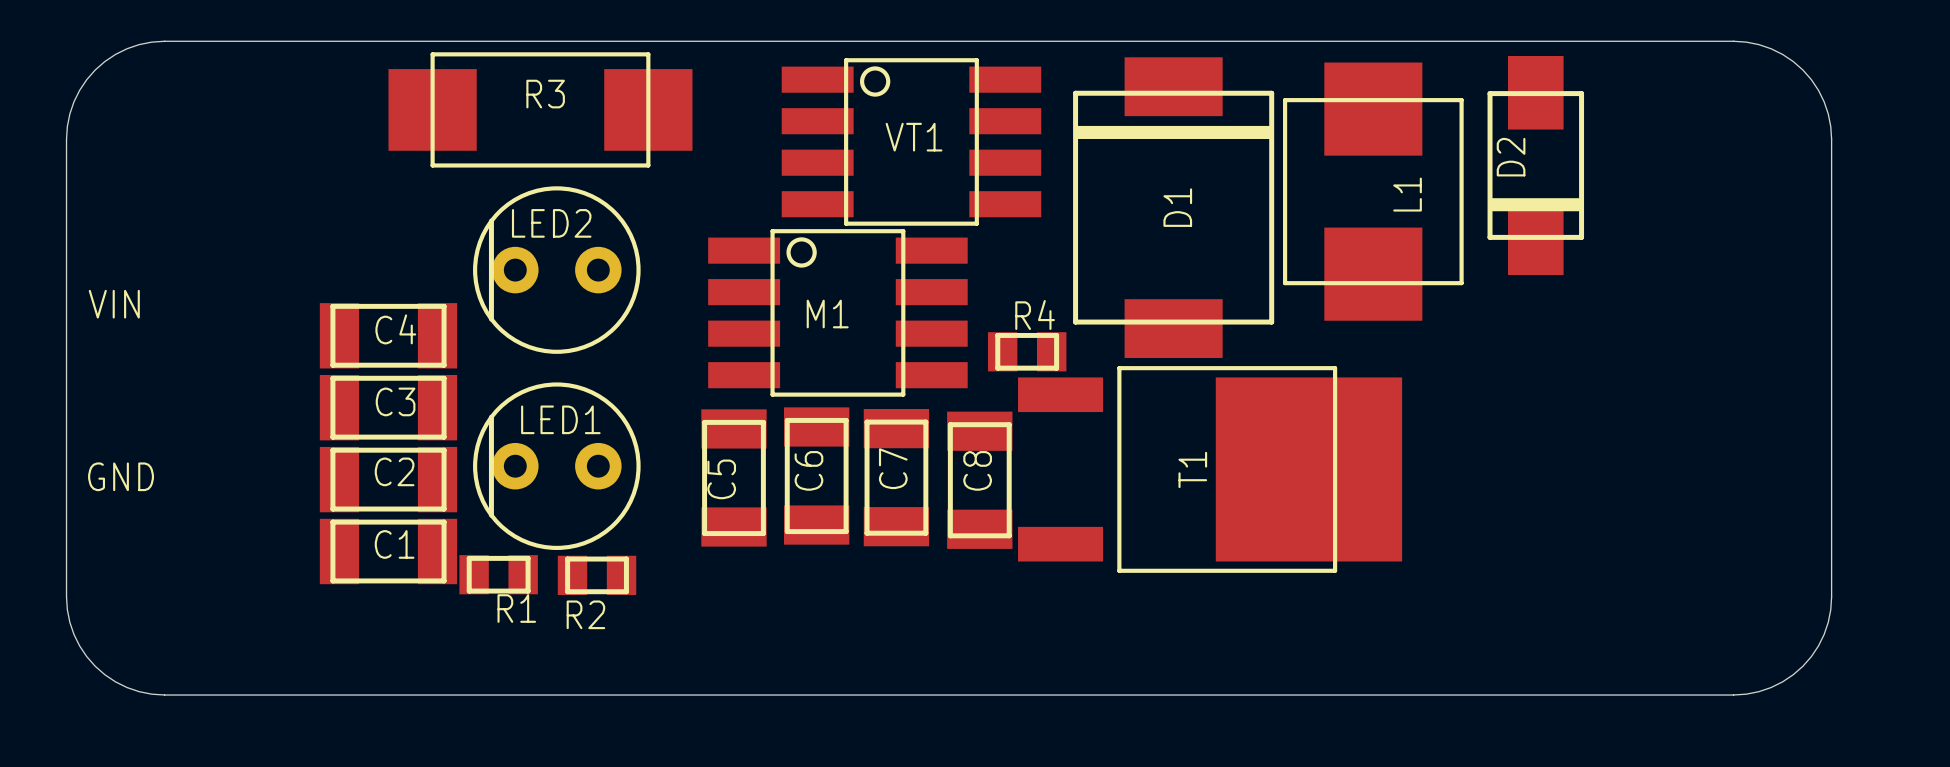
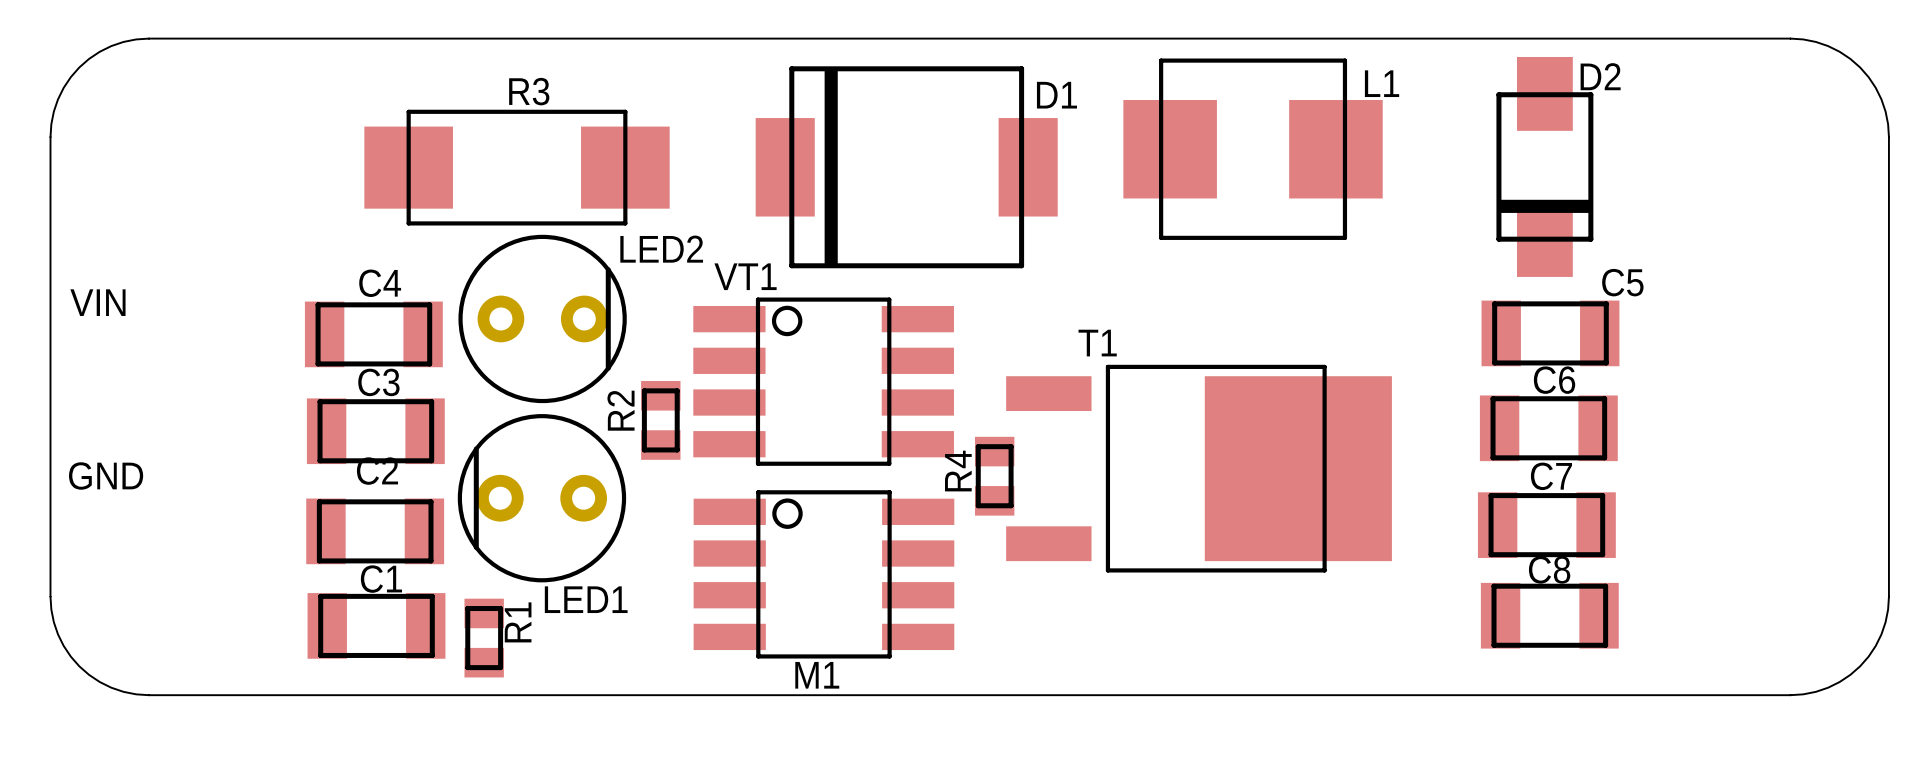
board edge: (1733, 41) (1758, 44) (1771, 48) (1793, 61) (1802, 70) (1811, 79) (1824, 101) (1828, 113) (1831, 139) (1830, 609) (1828, 622) (1818, 645) (1811, 656) (1793, 674) (1782, 681) (1758, 691) (1733, 695) -> (1724, 38) (1803, 39) (1815, 41) (1839, 51) (1860, 67) (1875, 87) (1885, 111) (1888, 137) (1888, 596) (1885, 622) (1875, 645) (1868, 656) (1850, 674) (1828, 687) (1803, 694) (1724, 695)
R3 position: (540, 109) -> (517, 167)
VT1 name position: VT1 (914, 137) -> VT1 (745, 276)
VT1 position: (911, 141) -> (823, 381)
D2 name rotation: 0° (1511, 157) -> 90° clockwise (1600, 76)
D2 name position: D2 (1511, 157) -> D2 (1600, 76)
D2 position: (1535, 165) -> (1544, 166)
L1 rotation: 0° (1373, 191) -> 90° clockwise (1253, 149)
L1 name position: L1 (1407, 194) -> L1 (1382, 83)
D1 rotation: 0° (1173, 207) -> 90° counterclockwise (906, 167)
D1 position: (1173, 207) -> (906, 167)
D1 name position: D1 (1177, 207) -> D1 (1056, 95)
LED2 name position: LED2 (551, 223) -> LED2 (661, 249)
LED2 rotation: 0° (556, 270) -> 180° (542, 318)
M1 position: (837, 312) -> (823, 574)
M1 name position: M1 (827, 314) -> M1 (817, 675)
C4 name position: C4 (395, 329) -> C4 (380, 283)
R4 rotation: 0° (1027, 351) -> 90° clockwise (994, 476)
R4 position: (1027, 351) -> (994, 476)
C3 name position: C3 (395, 401) -> C3 (378, 382)
C3 position: (388, 407) -> (375, 431)
LED1 name position: LED1 (560, 419) -> LED1 (586, 599)
LED1 position: (556, 466) -> (541, 498)
T1 name rotation: 0° (1192, 469) -> 90° clockwise (1097, 343)
T1 name position: T1 (1192, 469) -> T1 (1097, 343)
C6 rotation: 0° (816, 476) -> 90° clockwise (1548, 428)
C6 position: (816, 476) -> (1548, 428)
C5 rotation: 0° (733, 477) -> 90° clockwise (1550, 333)
C5 position: (733, 477) -> (1550, 333)
C7 rotation: 0° (896, 477) -> 90° clockwise (1546, 525)
C7 position: (896, 477) -> (1546, 525)
C2 position: (388, 479) -> (375, 531)
C5 name position: C5 (721, 479) -> C5 (1622, 282)
C8 rotation: 0° (979, 480) -> 90° clockwise (1549, 615)
C8 position: (979, 480) -> (1549, 615)
C1 name position: C1 (394, 544) -> C1 (381, 579)
C1 position: (388, 551) -> (376, 625)
R1 rotation: 0° (498, 574) -> 90° clockwise (484, 638)
R1 position: (498, 574) -> (484, 638)
R2 rotation: 0° (597, 575) -> 90° clockwise (660, 420)
R2 position: (597, 575) -> (660, 420)

